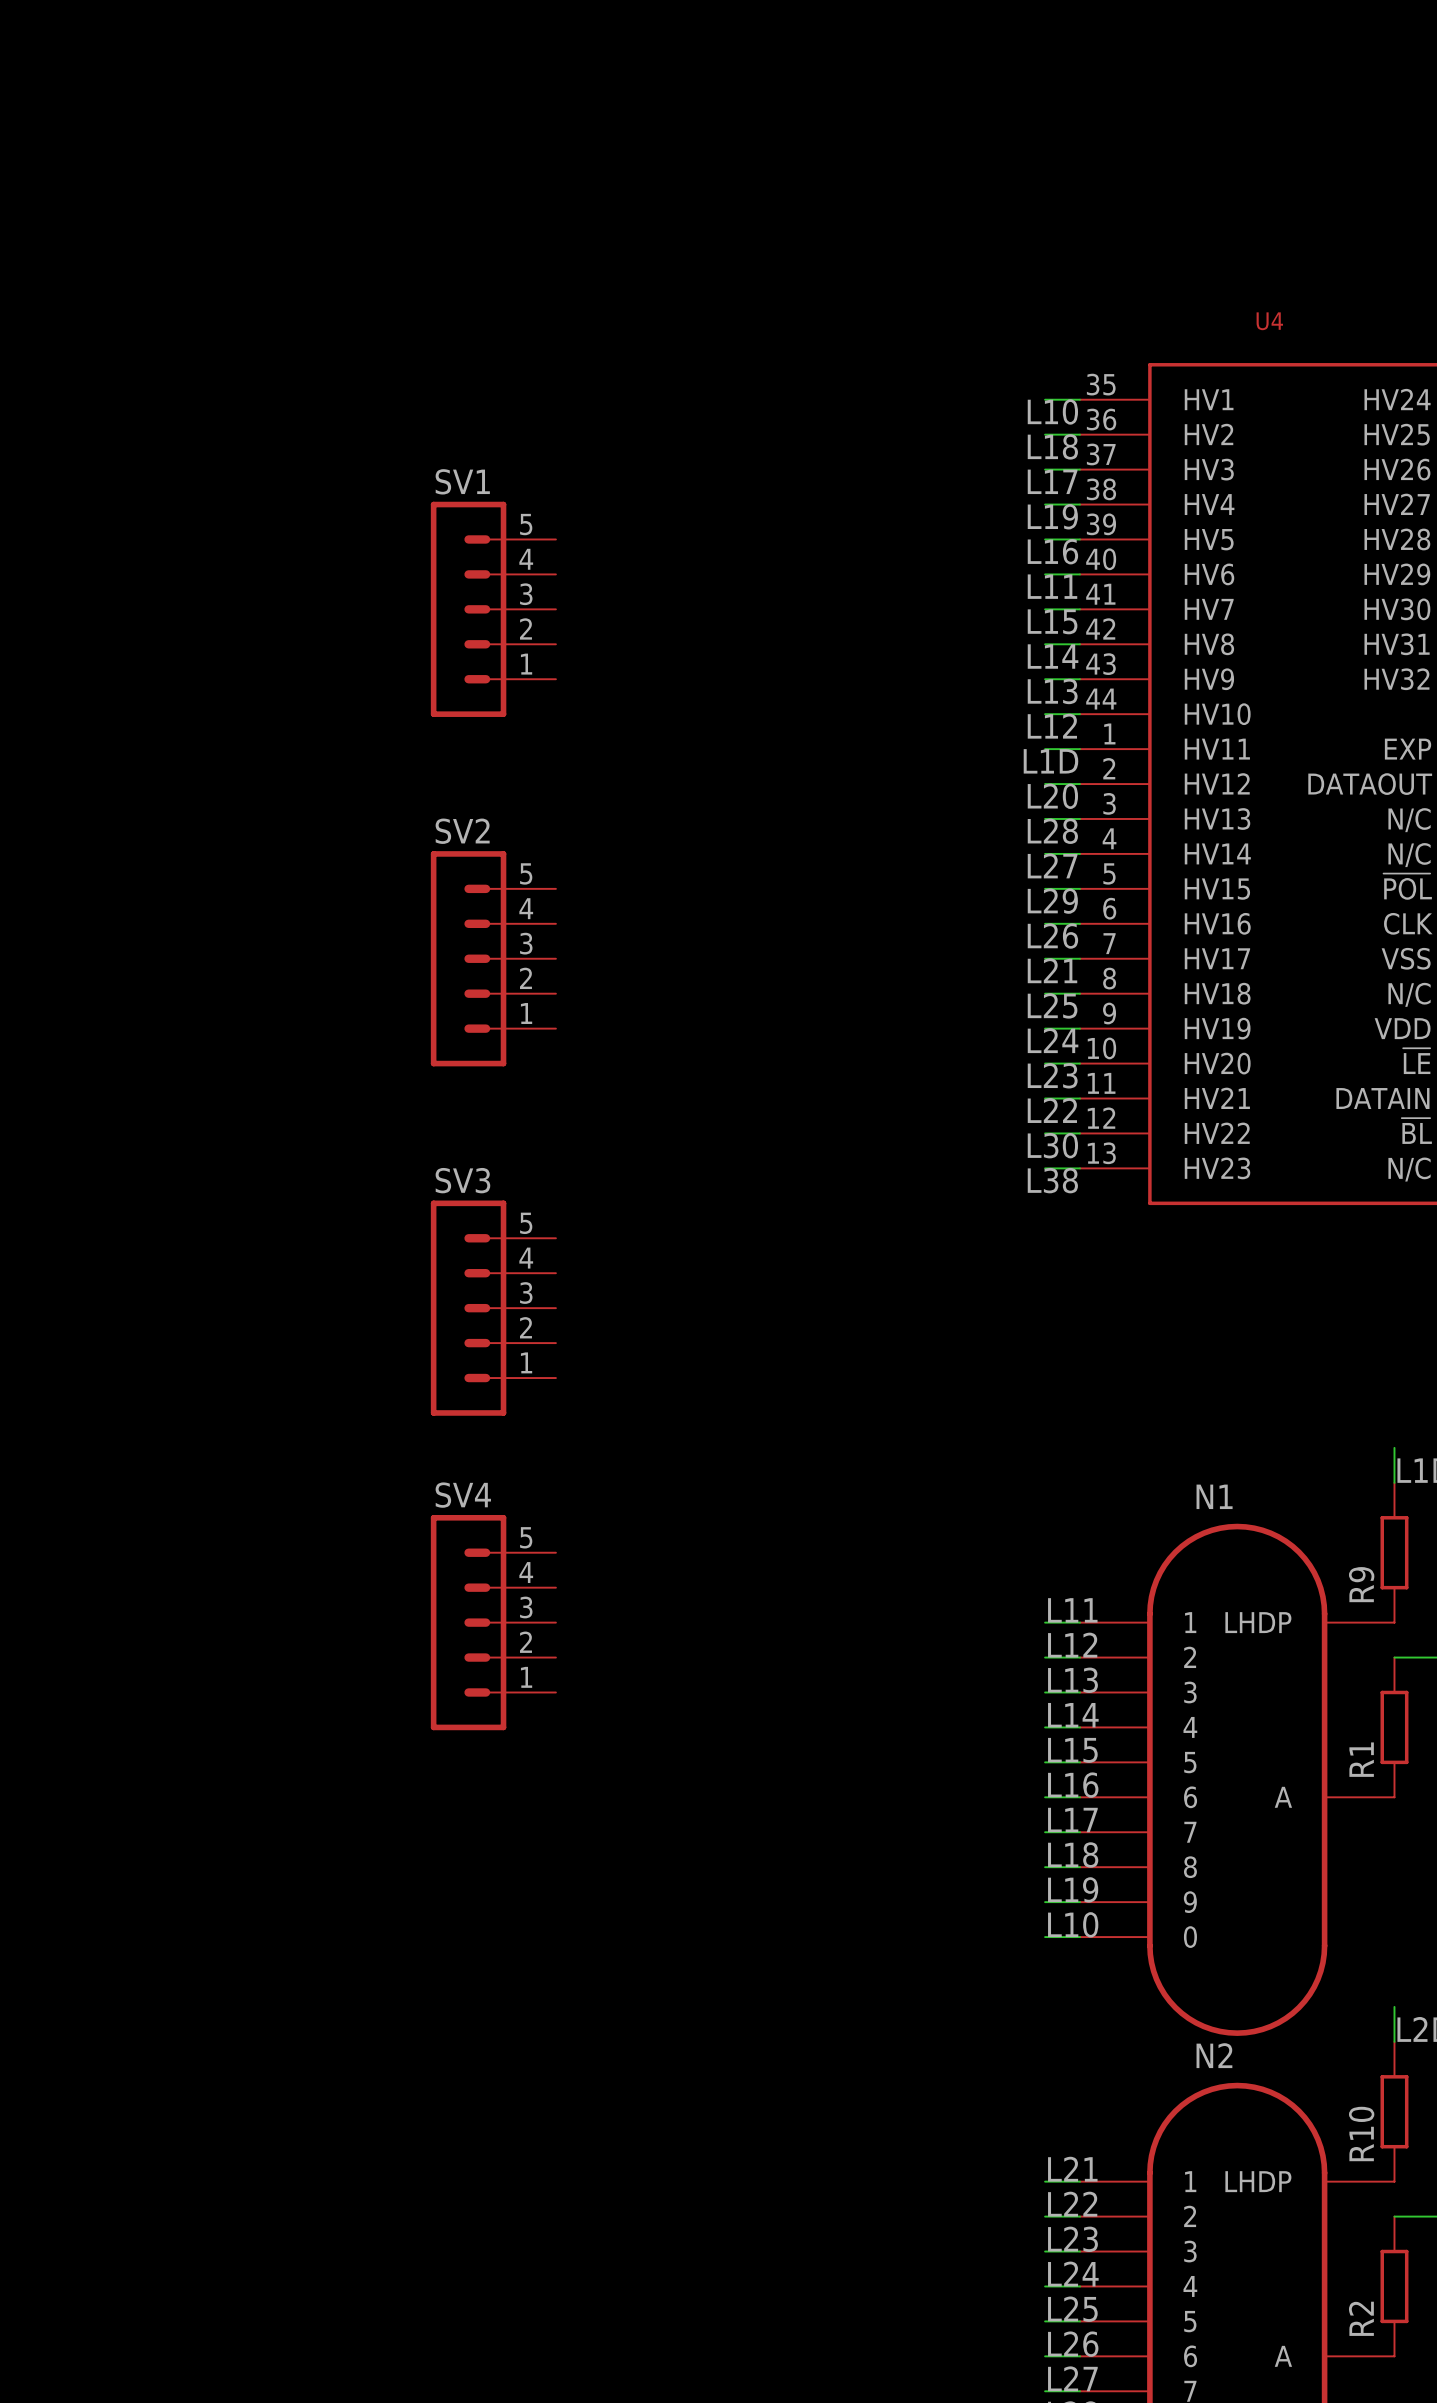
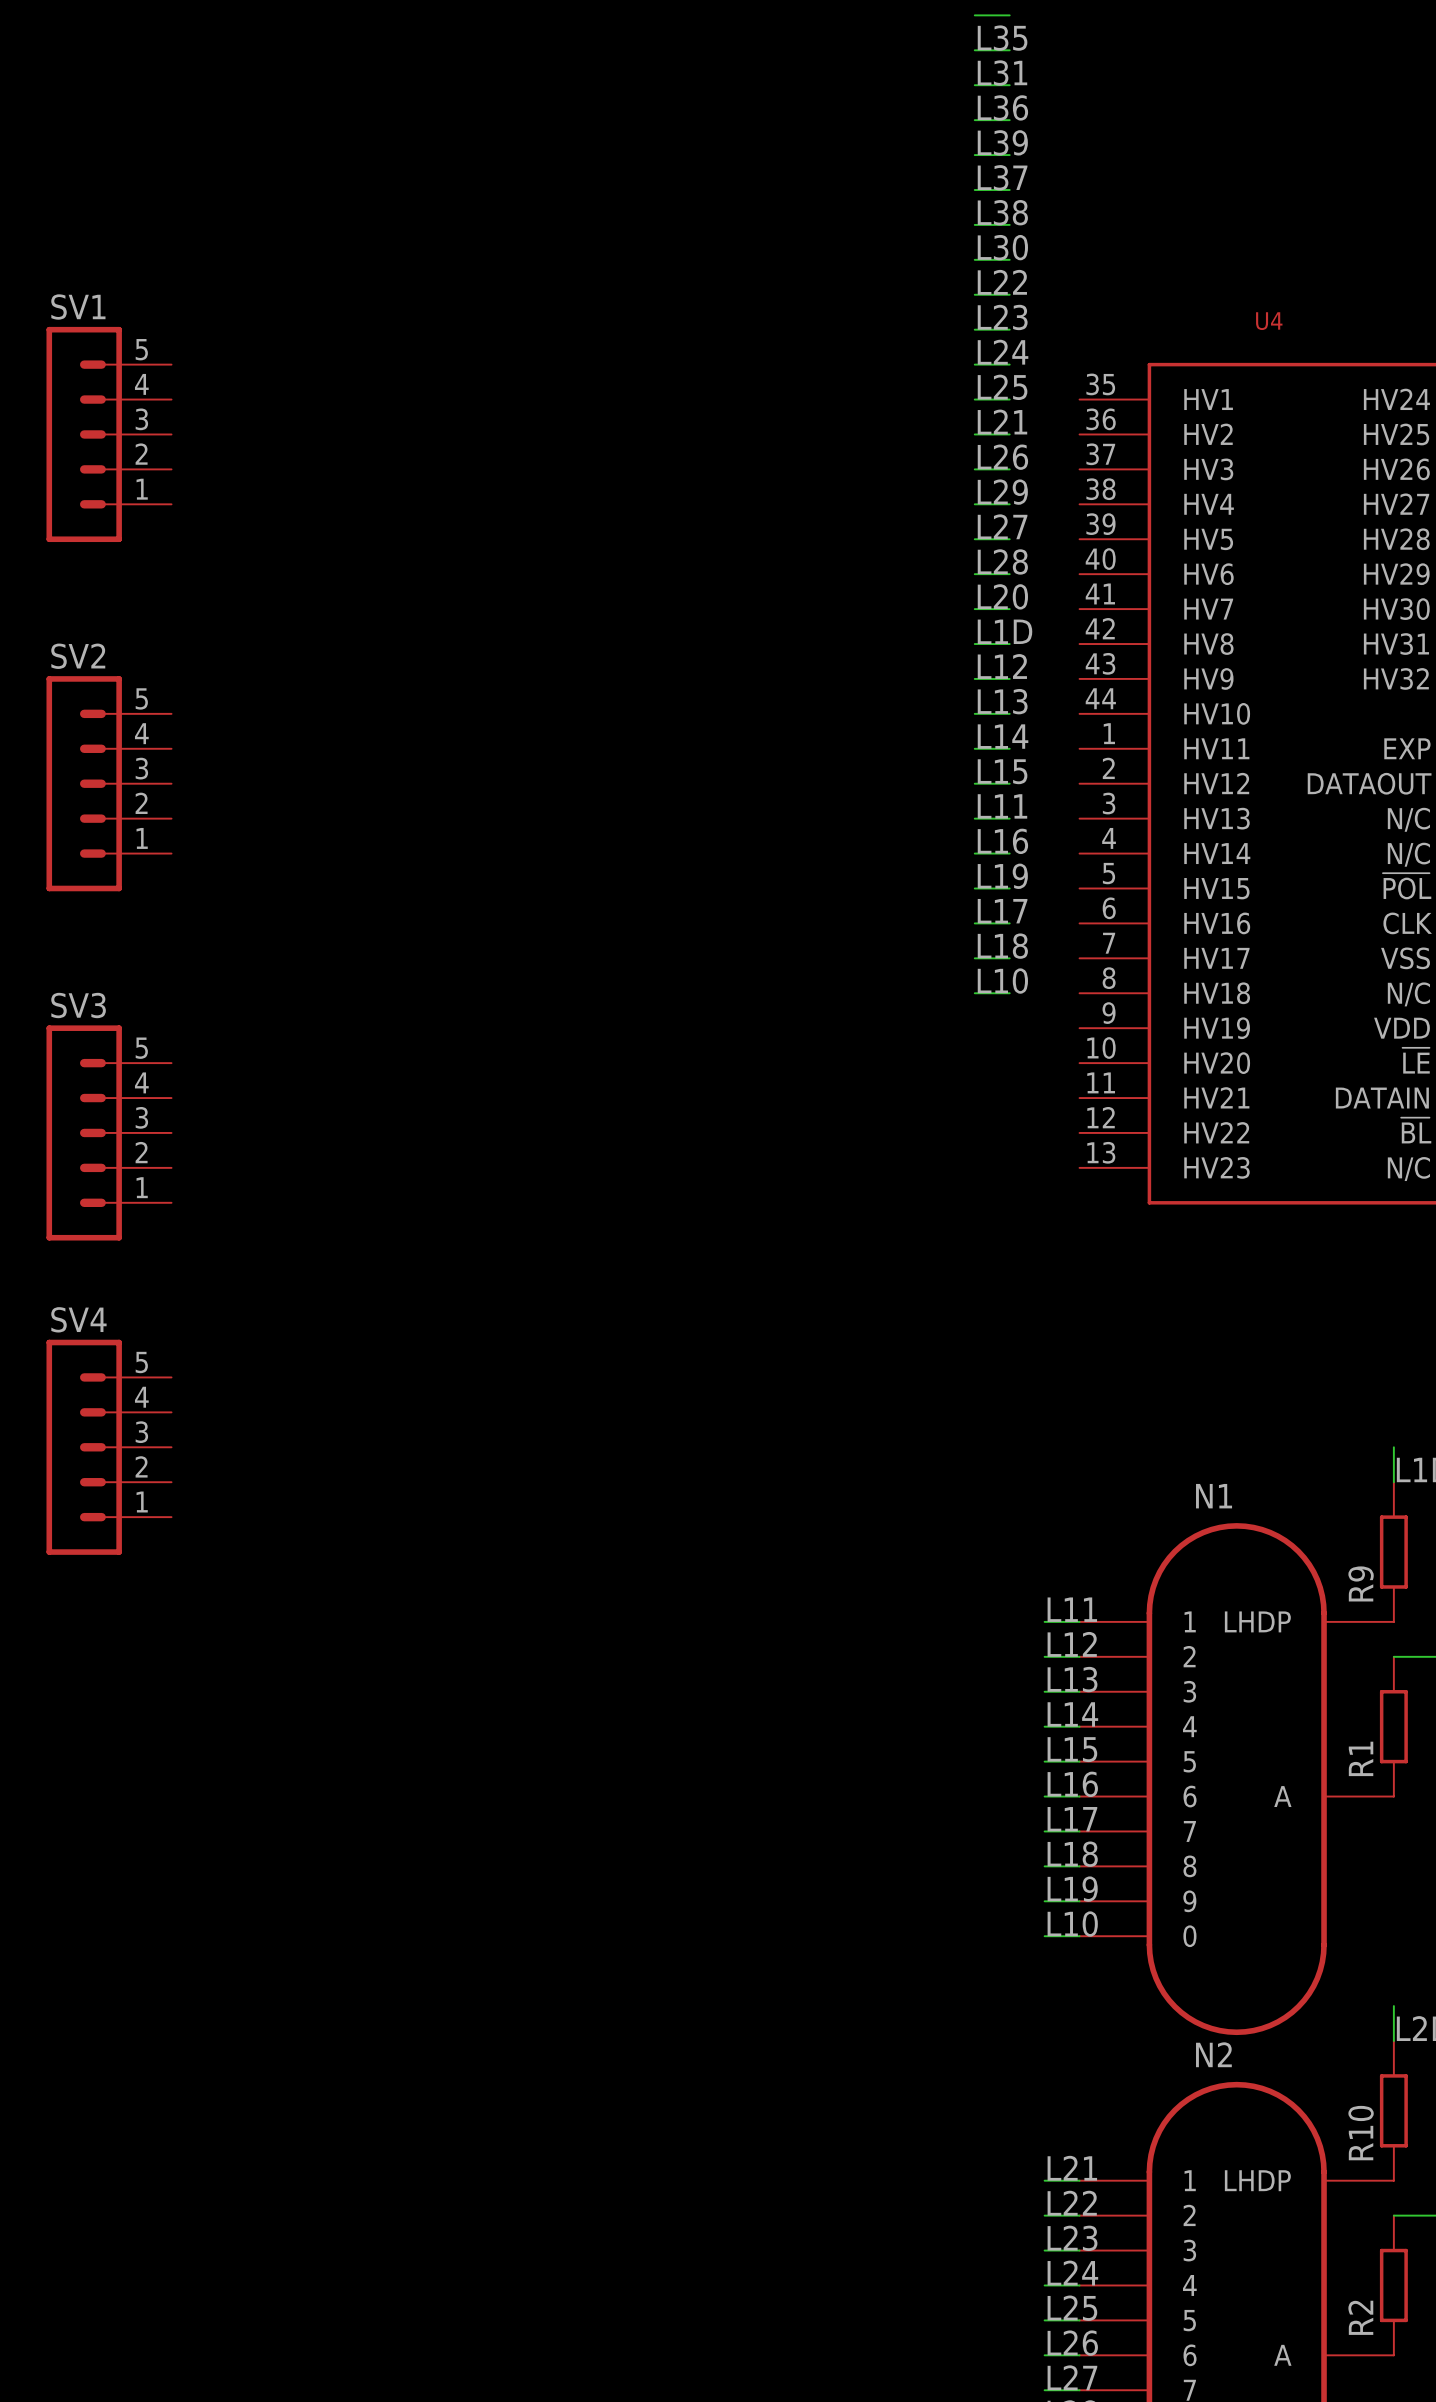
wire: none -> (974, 15) (1009, 15)
label: none -> L35 (1002, 38)
wire: none -> (974, 50) (1009, 50)
label: none -> L31 (1002, 73)
wire: none -> (974, 85) (1009, 85)
label: none -> L36 (1002, 107)
wire: none -> (974, 120) (1009, 120)
label: none -> L39 (1002, 142)
wire: none -> (974, 155) (1009, 155)
label: none -> L37 (1002, 177)
wire: none -> (974, 189) (1009, 189)
label: none -> L38 (1002, 212)
label: none -> L30 (1002, 247)
label: none -> L22 (1002, 282)
label: none -> L23 (1002, 317)
label: none -> L24 (1003, 352)
label: none -> L25 (1002, 387)
wire: (1045, 399) (1080, 399) -> (974, 224) (1009, 224)
label: L10 (1052, 411) -> none
label: none -> L21 (1002, 422)
wire: (1045, 434) (1080, 434) -> (974, 259) (1009, 259)
label: L18 (1052, 446) -> none
label: none -> L26 (1002, 457)
wire: (1045, 469) (1080, 469) -> (974, 294) (1009, 294)
label: L17 (1052, 481) -> none
wire: (1045, 504) (1080, 504) -> (974, 329) (1009, 329)
label: L19 (1052, 516) -> L29 (1002, 492)
wire: (1045, 539) (1080, 539) -> (974, 364) (1009, 364)
label position: L16 (1052, 551) -> L16 (1002, 841)
wire: (1045, 574) (1080, 574) -> (974, 399) (1009, 399)
label position: L11 (1052, 586) -> L11 (1002, 806)
SV1 position: (493, 609) -> (109, 434)
wire: (1045, 609) (1080, 609) -> (974, 434) (1009, 434)
label position: L15 (1052, 621) -> L15 (1002, 771)
wire: (1045, 644) (1080, 644) -> (974, 469) (1009, 469)
label position: L14 (1053, 656) -> L14 (1003, 736)
wire: (1045, 679) (1080, 679) -> (974, 504) (1009, 504)
label position: L13 (1052, 691) -> L13 (1002, 701)
wire: (1045, 714) (1080, 714) -> (974, 539) (1009, 539)
label position: L12 (1052, 726) -> L12 (1002, 666)
wire: (1045, 749) (1080, 749) -> (974, 574) (1009, 574)
label position: L1D (1050, 761) -> L1D (1005, 631)
wire: (1045, 784) (1080, 784) -> (974, 609) (1009, 609)
label position: L20 (1052, 796) -> L20 (1002, 596)
wire: (1045, 818) (1080, 818) -> (974, 644) (1009, 644)
label position: L28 (1052, 831) -> L28 (1002, 561)
wire: (1045, 853) (1080, 853) -> (974, 678) (1009, 678)
label position: L27 (1052, 865) -> L27 (1002, 526)
wire: (1045, 888) (1080, 888) -> (974, 713) (1009, 713)
label: L29 (1052, 901) -> L19 (1002, 876)
label: none -> L17 (1002, 911)
wire: (1045, 923) (1080, 923) -> (974, 748) (1009, 748)
label: L26 (1052, 936) -> none
label: none -> L18 (1002, 946)
SV2 position: (493, 958) -> (109, 783)
wire: (1045, 958) (1080, 958) -> (974, 783) (1009, 783)
label: L21 (1052, 970) -> none
label: none -> L10 (1002, 981)
wire: (1045, 993) (1080, 993) -> (974, 818) (1009, 818)
label: L25 (1052, 1005) -> none
wire: (1045, 1028) (1080, 1028) -> (974, 853) (1009, 853)
label: L24 (1053, 1040) -> none
wire: (1045, 1063) (1080, 1063) -> (974, 888) (1009, 888)
label: L23 (1052, 1075) -> none
wire: (1045, 1098) (1080, 1098) -> (974, 923) (1009, 923)
label: L22 (1052, 1110) -> none
wire: (1045, 1133) (1080, 1133) -> (974, 958) (1009, 958)
label: L30 (1052, 1145) -> none
wire: (1045, 1168) (1080, 1168) -> (974, 993) (1009, 993)
label: L38 (1052, 1180) -> none
SV3 position: (493, 1308) -> (109, 1132)
SV4 position: (493, 1622) -> (109, 1447)

